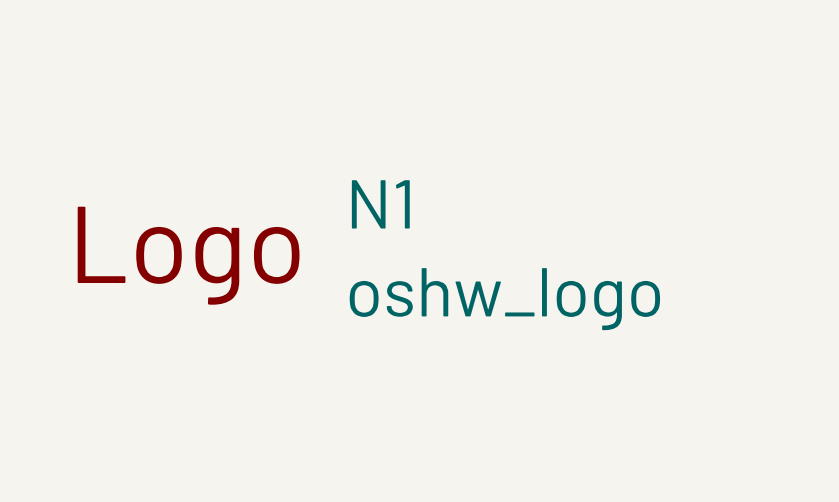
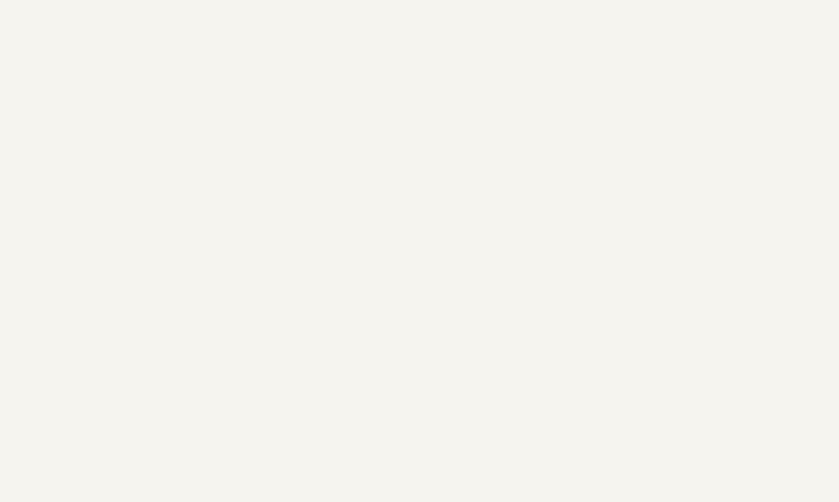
N1: oshw_logo (368, 255) -> none

